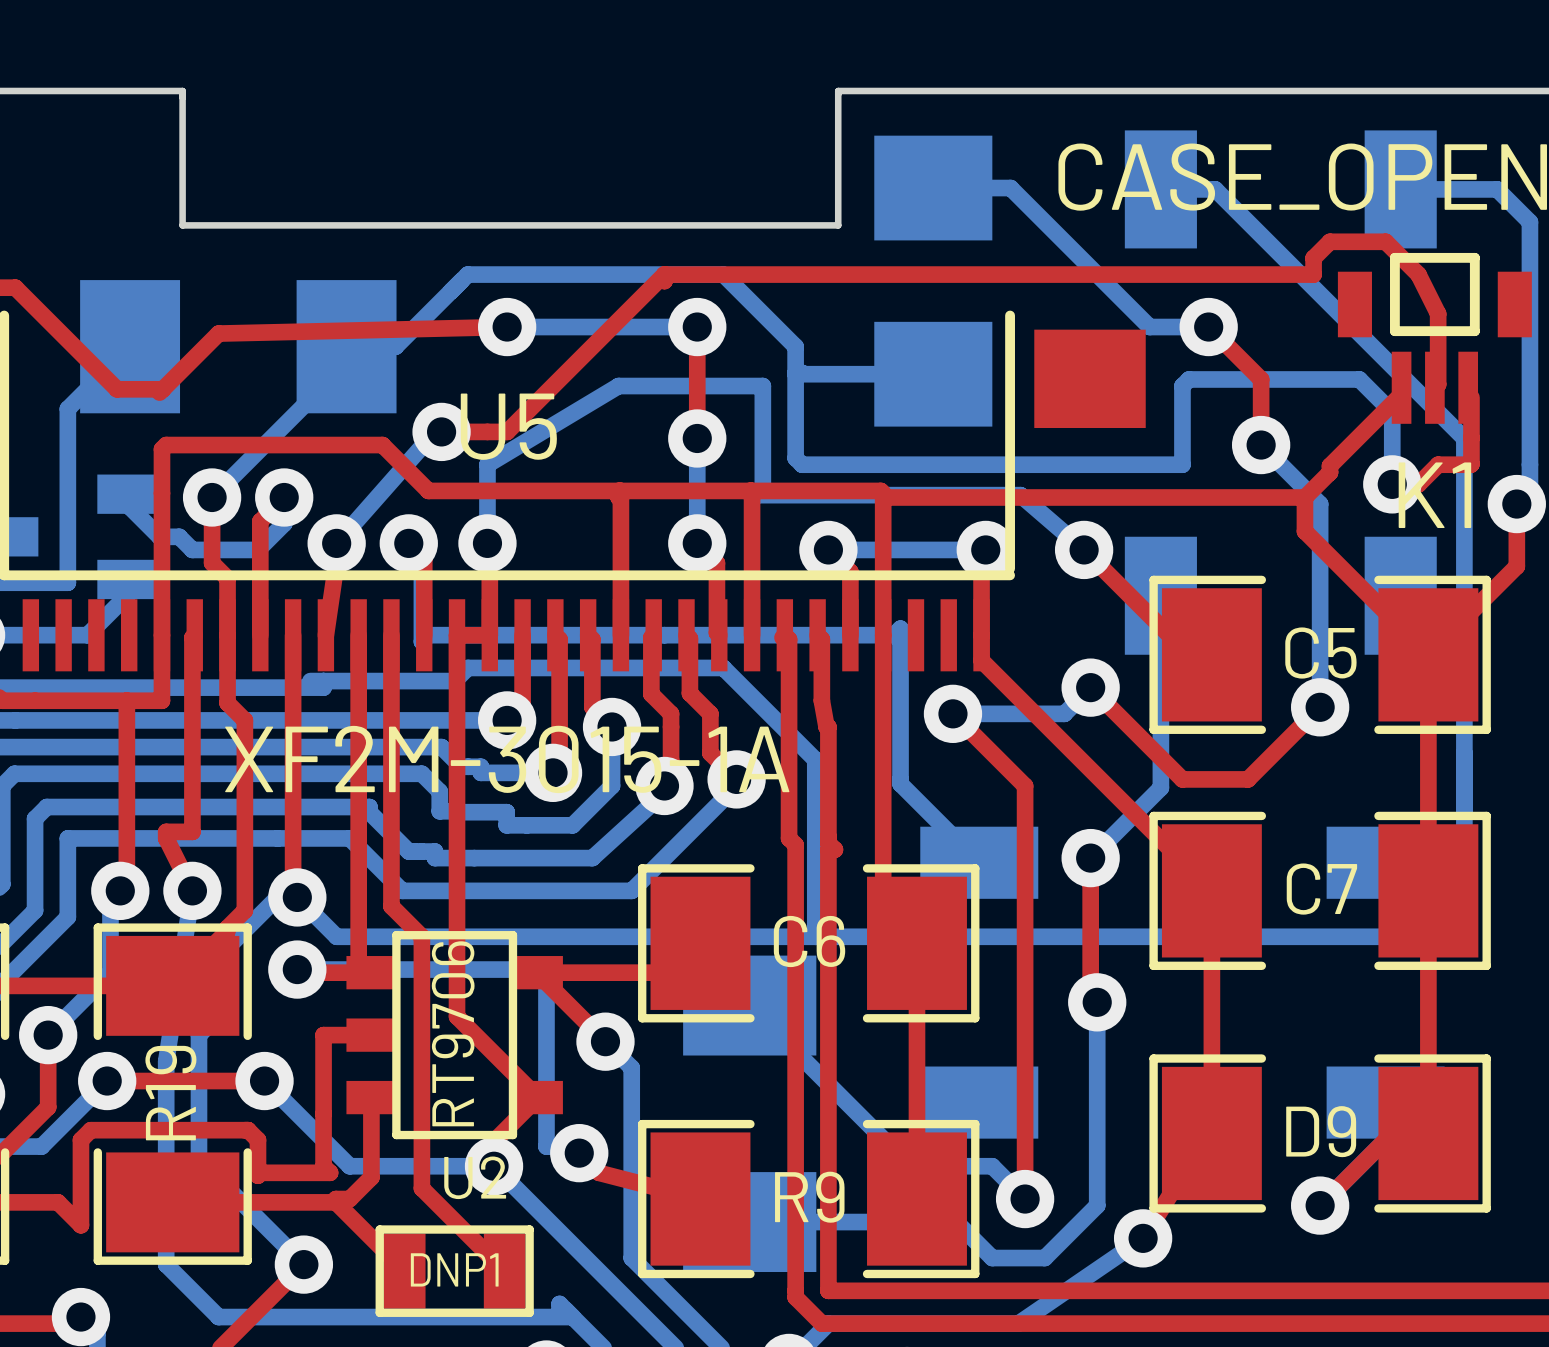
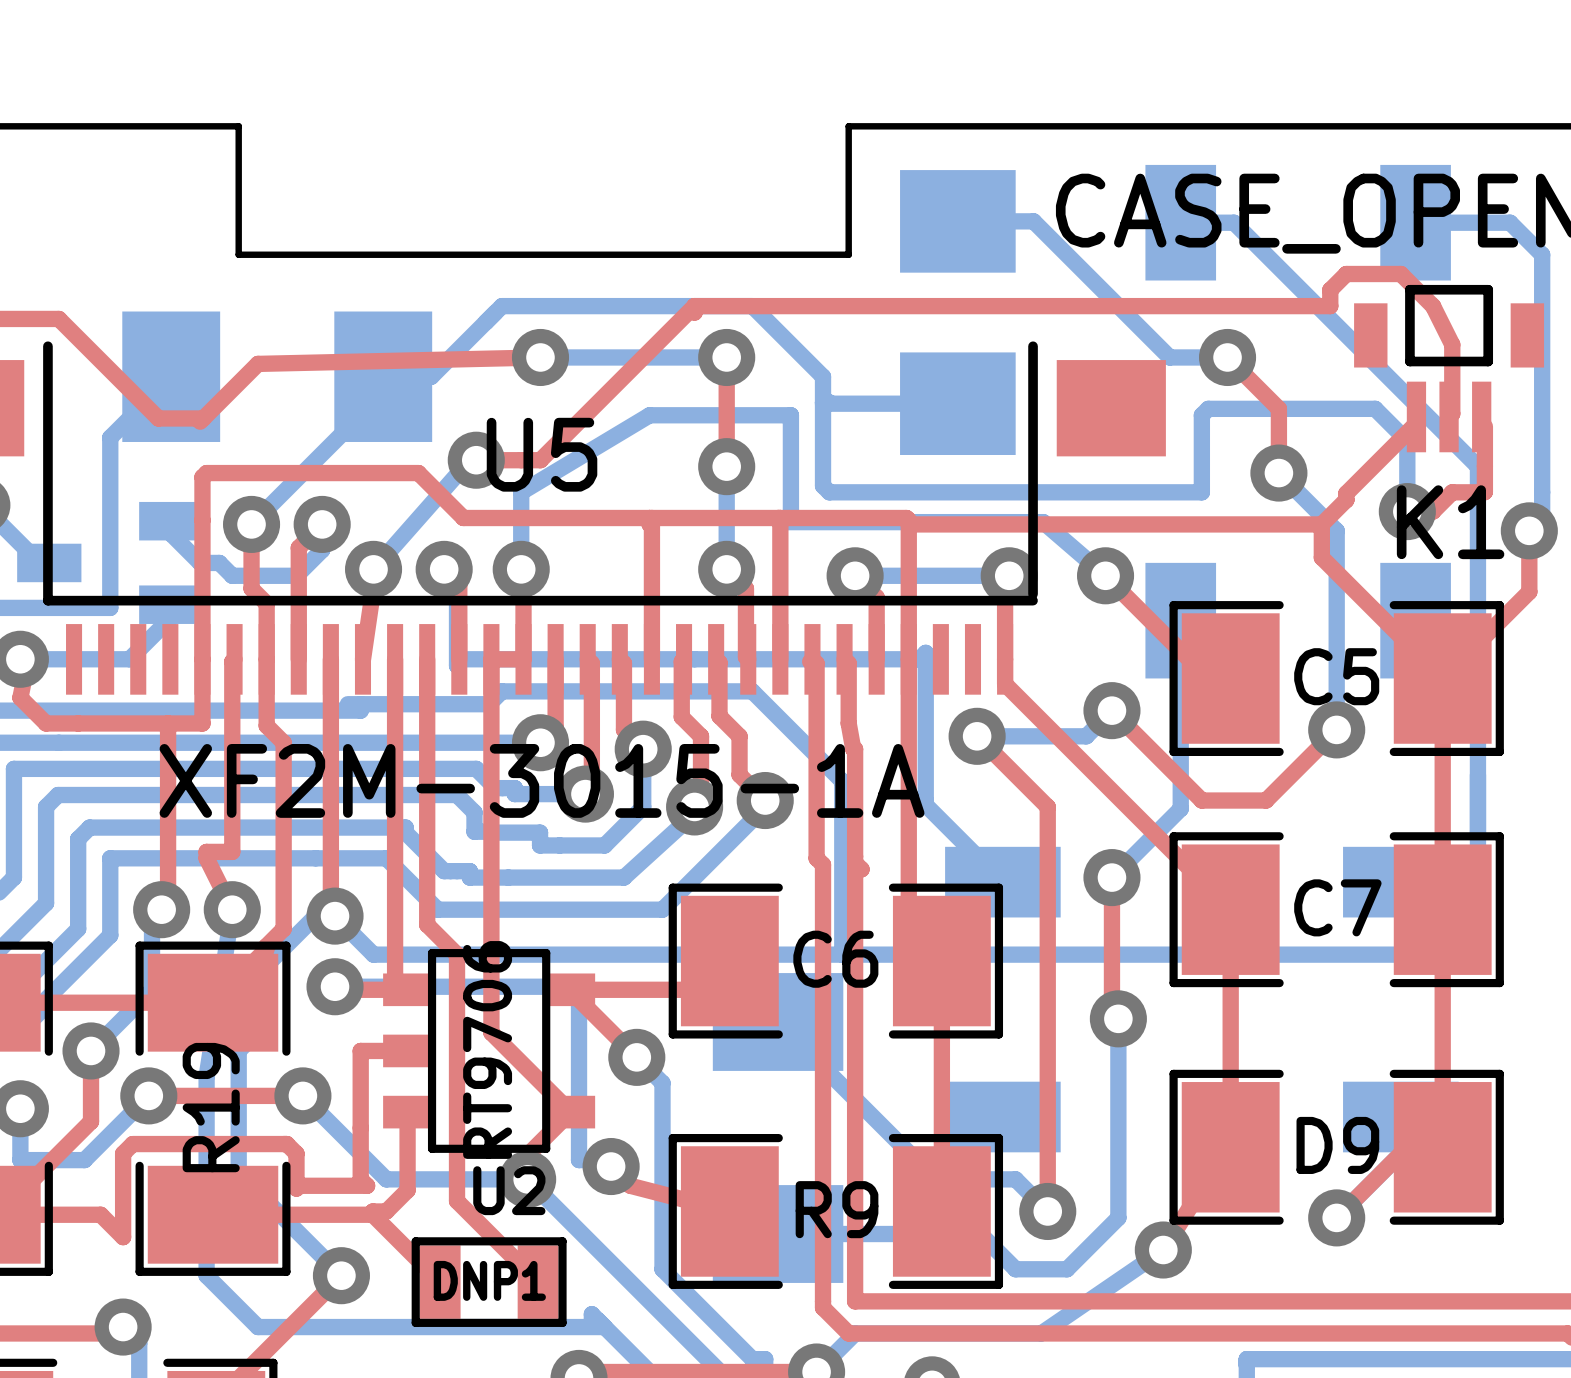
board edge: (182, 90) (182, 225) (838, 225) (838, 90) -> (222, 126) (238, 126) (238, 254) (848, 254) (848, 126) (864, 126)

